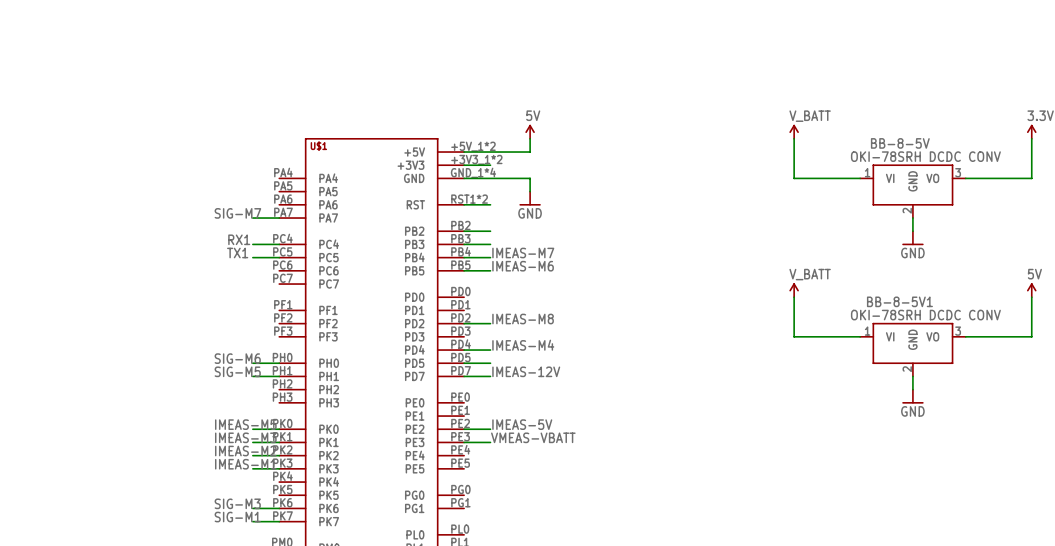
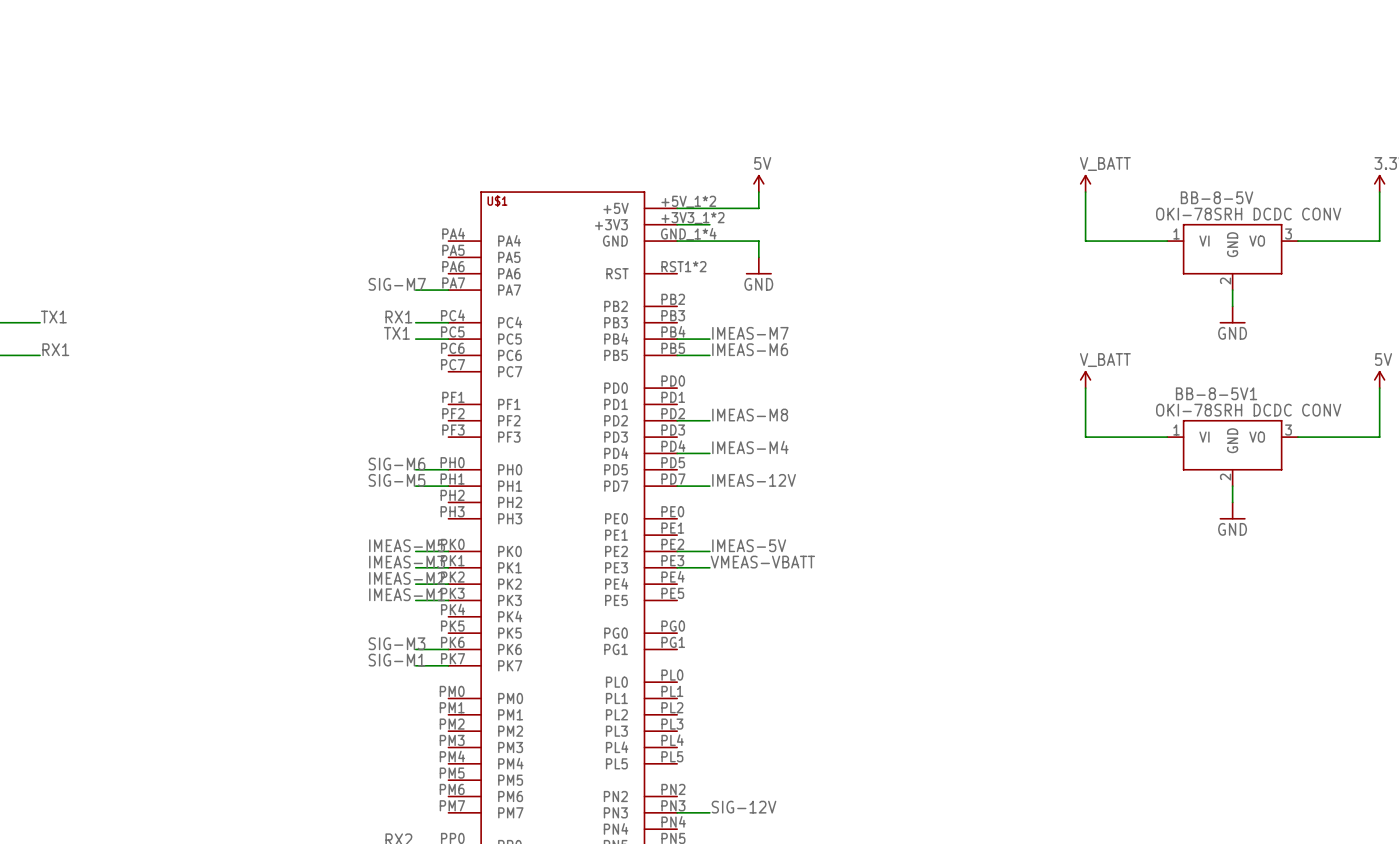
wire: (464, 204) (490, 204) -> none
wire: (464, 231) (490, 231) -> none
wire: (464, 244) (490, 244) -> none
wire: (464, 363) (490, 363) -> none

